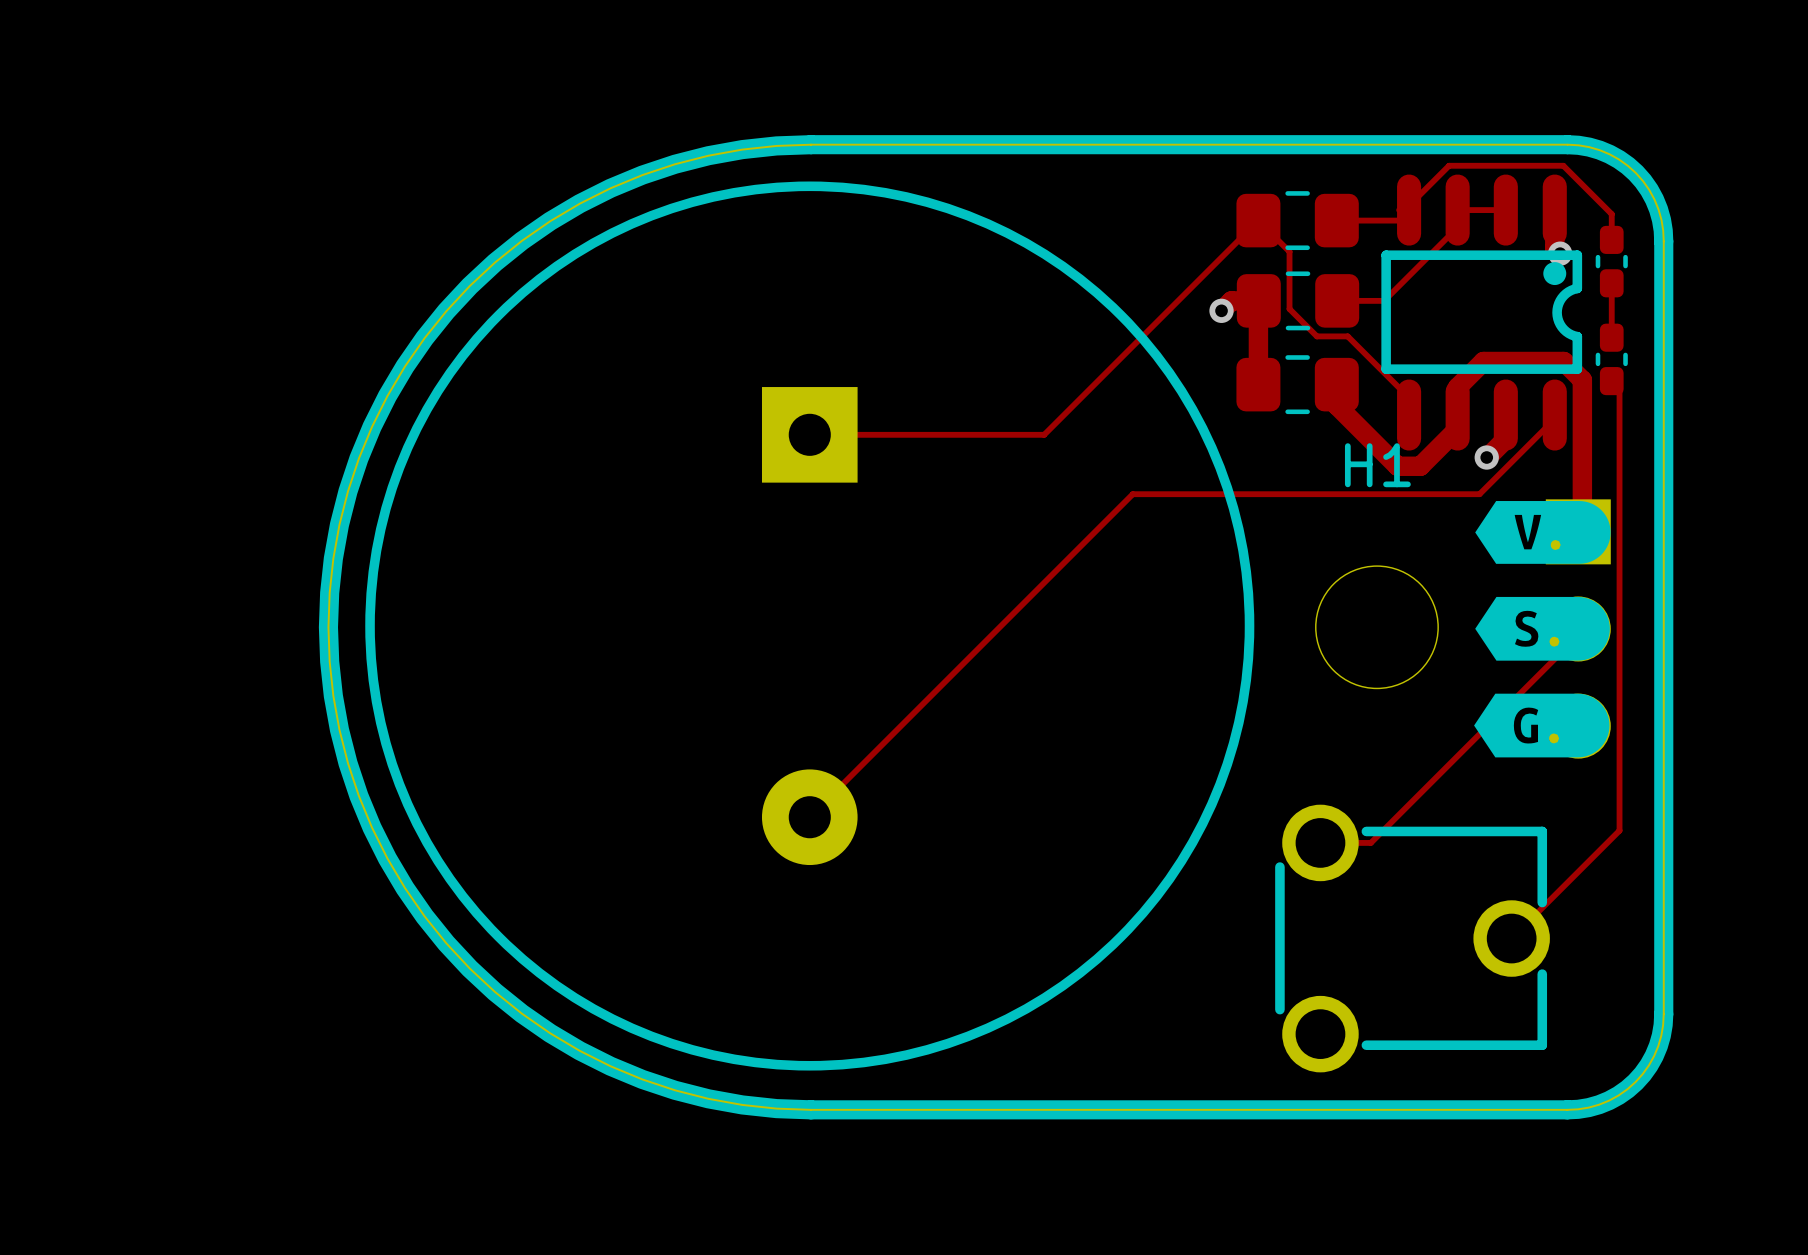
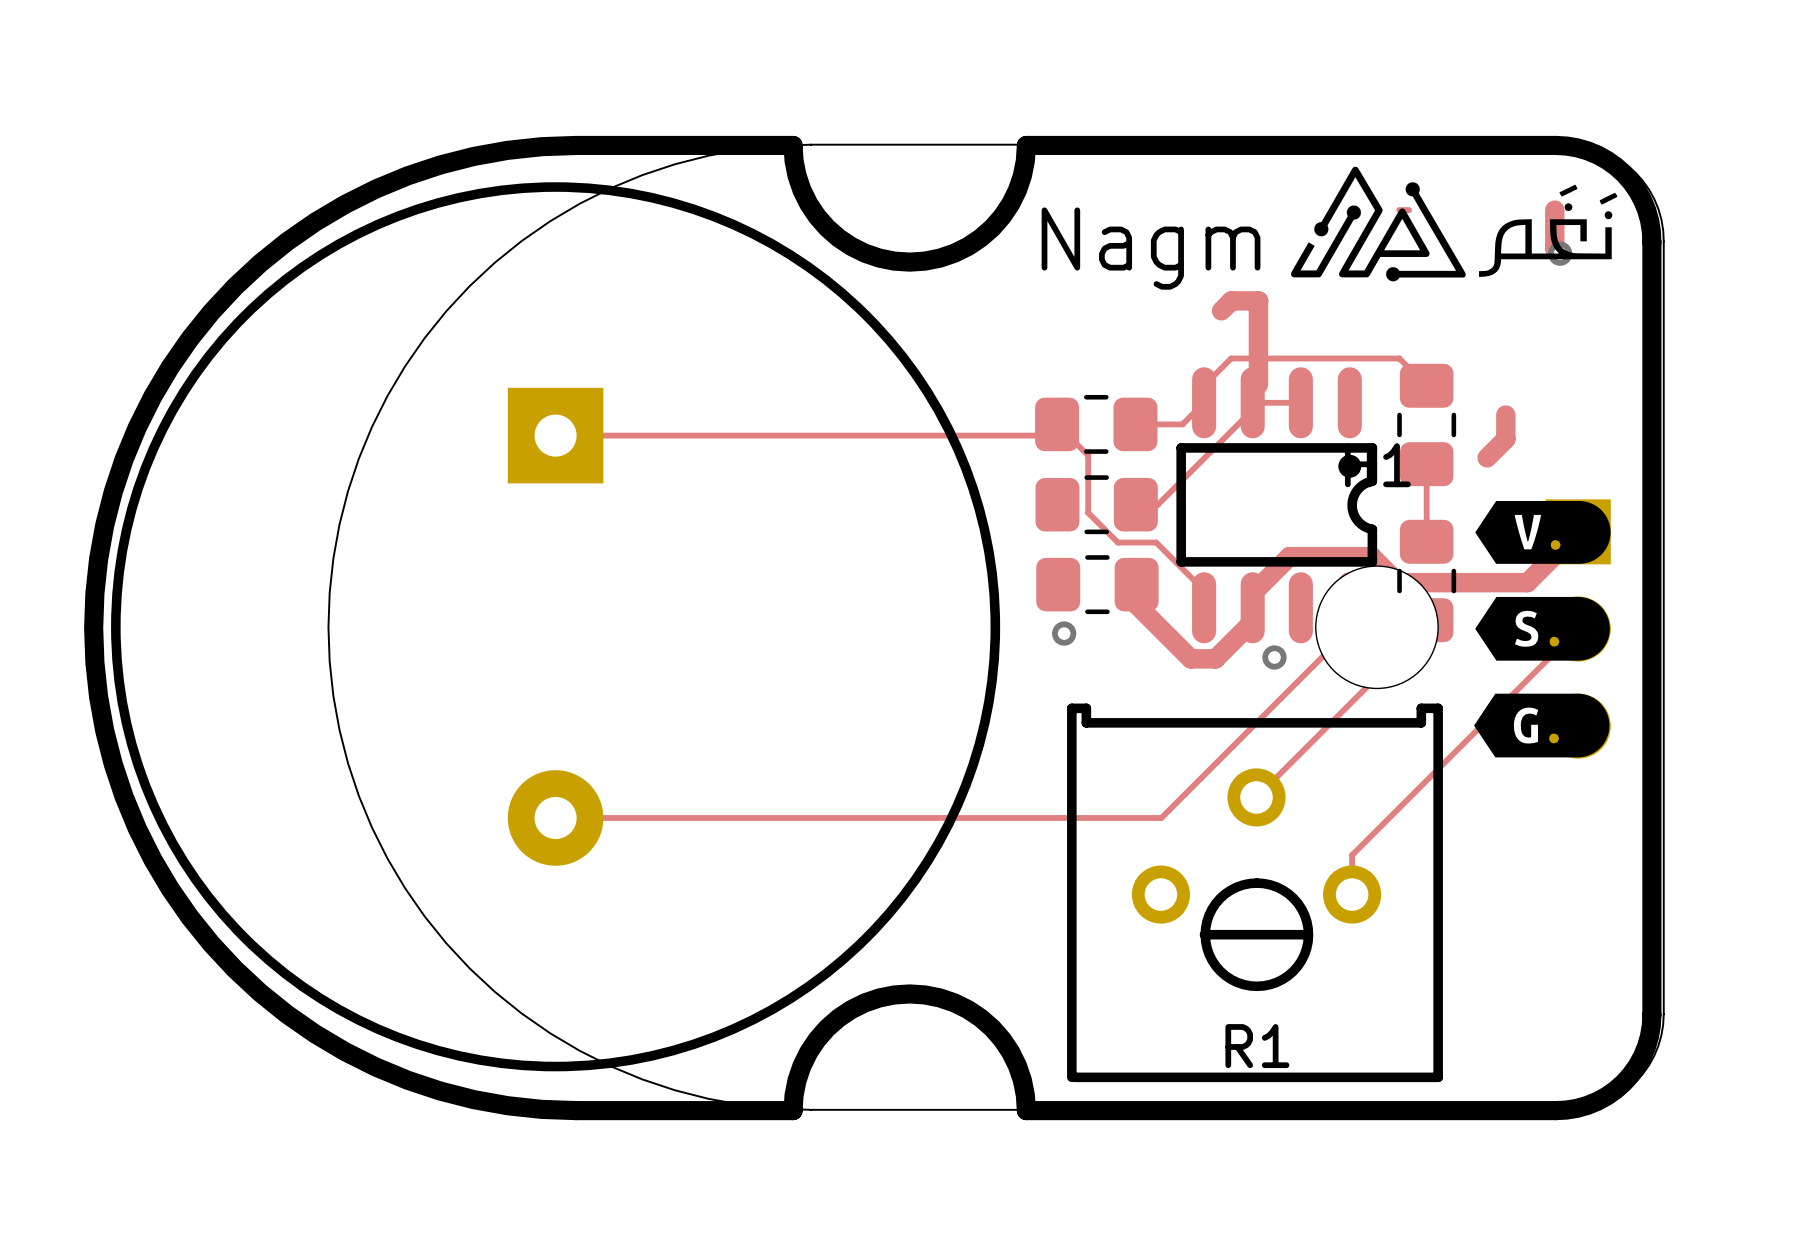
line: (1567, 144) (776, 145) (742, 149) (675, 164) (610, 188) (550, 221) (521, 240) (469, 286) (446, 311) (405, 366) (387, 395) (358, 458) (339, 524) (329, 592) (329, 661) (333, 695) (347, 763) (358, 795) (387, 858) (405, 888) (446, 943) (469, 968) (495, 991) (550, 1033) (579, 1050) (642, 1079) (708, 1098) (742, 1104) (811, 1109) (1567, 1109) (1588, 1107) (1618, 1095) (1642, 1074) (1654, 1055) (1661, 1035) (1663, 1014) (1663, 230) (1654, 199) (1635, 173) (1619, 159) (1599, 150) (1567, 144) -> (1555, 1110) (1566, 1110) (1576, 1108) (1597, 1101) (1623, 1082) (1637, 1066) (1646, 1046) (1651, 1015) (1651, 231) (1646, 210) (1637, 190) (1624, 173) (1597, 155) (1577, 147) (1555, 145) (1026, 145) (1025, 160) (1017, 190) (1002, 216) (992, 227) (980, 238) (954, 253) (924, 261) (909, 262) (894, 261) (865, 253) (838, 238) (827, 227) (808, 203) (801, 190) (797, 175) (793, 145) (576, 145) (541, 146) (473, 156) (440, 165) (375, 189) (315, 222) (260, 263) (211, 312) (189, 338) (170, 367) (137, 427) (113, 492) (104, 525) (94, 593) (93, 628) (94, 662) (104, 730) (124, 796) (152, 859) (170, 888) (211, 944) (260, 992) (287, 1014) (315, 1034) (375, 1067) (440, 1091) (473, 1099) (541, 1109) (793, 1110) (797, 1080) (801, 1065) (808, 1052) (827, 1028) (838, 1018) (865, 1002) (894, 994) (909, 993) (924, 994) (954, 1002) (980, 1018) (992, 1028) (1002, 1039) (1017, 1065) (1025, 1095) (1026, 1110) (1555, 1110)
drawing: none -> [1290, 166, 1618, 282]
track: (1505, 210) (1457, 210) (1457, 227) (1384, 300) (1337, 300) -> none
part: (1297, 220) -> none
track: (1336, 220) (1398, 220) (1409, 210) (1409, 205) (1449, 165) (1563, 165) (1611, 214) (1611, 239) -> none
text: none -> Nagm (1151, 248)
part: (1611, 261) -> none
track: (1611, 283) (1611, 337) -> none
part: (1298, 300) -> none
via: (1221, 310) -> none
part position: (1481, 312) -> (1276, 505)
part: (1611, 359) -> none
track: (1611, 381) (1619, 388) (1619, 830) (1511, 938) -> none
part: (1297, 384) -> none
track: (1336, 384) (1336, 405) (1397, 466) (1420, 466) (1457, 429) (1457, 387) (1483, 361) (1563, 361) (1582, 380) (1582, 527) (1578, 531) -> (1136, 584) (1136, 604) (1190, 658) (1215, 658) (1252, 621) (1252, 593) (1289, 556) (1371, 556) (1397, 582) (1527, 582) (1578, 531)
track: none -> (1426, 385) (1399, 358) (1231, 358) (1204, 385) (1204, 402) (1182, 424) (1135, 424)
track: (1409, 397) (1347, 336) (1316, 336) (1289, 309) (1289, 251) (1258, 220) (1044, 434) (809, 434) -> none
track: none -> (1300, 402) (1252, 402) (1252, 409) (1157, 504) (1135, 504)
track: (1554, 415) (1554, 419) (1479, 494) (1132, 494) (809, 817) -> none
track: none -> (1056, 423) (1088, 455) (1088, 512) (1117, 542) (1156, 542) (1204, 590) (1204, 607)
track: none -> (1057, 424) (1045, 435) (555, 435)
part: none -> (1096, 424)
part: none -> (1426, 424)
via: (1486, 457) -> none
track: none -> (1426, 464) (1426, 541)
part: none -> (1096, 504)
part: none -> (1426, 580)
part: none -> (1097, 584)
track: none -> (1349, 607) (1349, 629) (1161, 817) (555, 817)
track: none -> (1420, 620) (1426, 620) (1426, 627) (1256, 797)
part position: (809, 626) -> (555, 626)
track: (1578, 628) (1578, 635) (1370, 842) (1320, 842) -> (1578, 628) (1352, 855) (1352, 894)
via: none -> (1064, 633)
via: none -> (1274, 657)
R1: none -> (1254, 892)
part: (1412, 938) -> none

